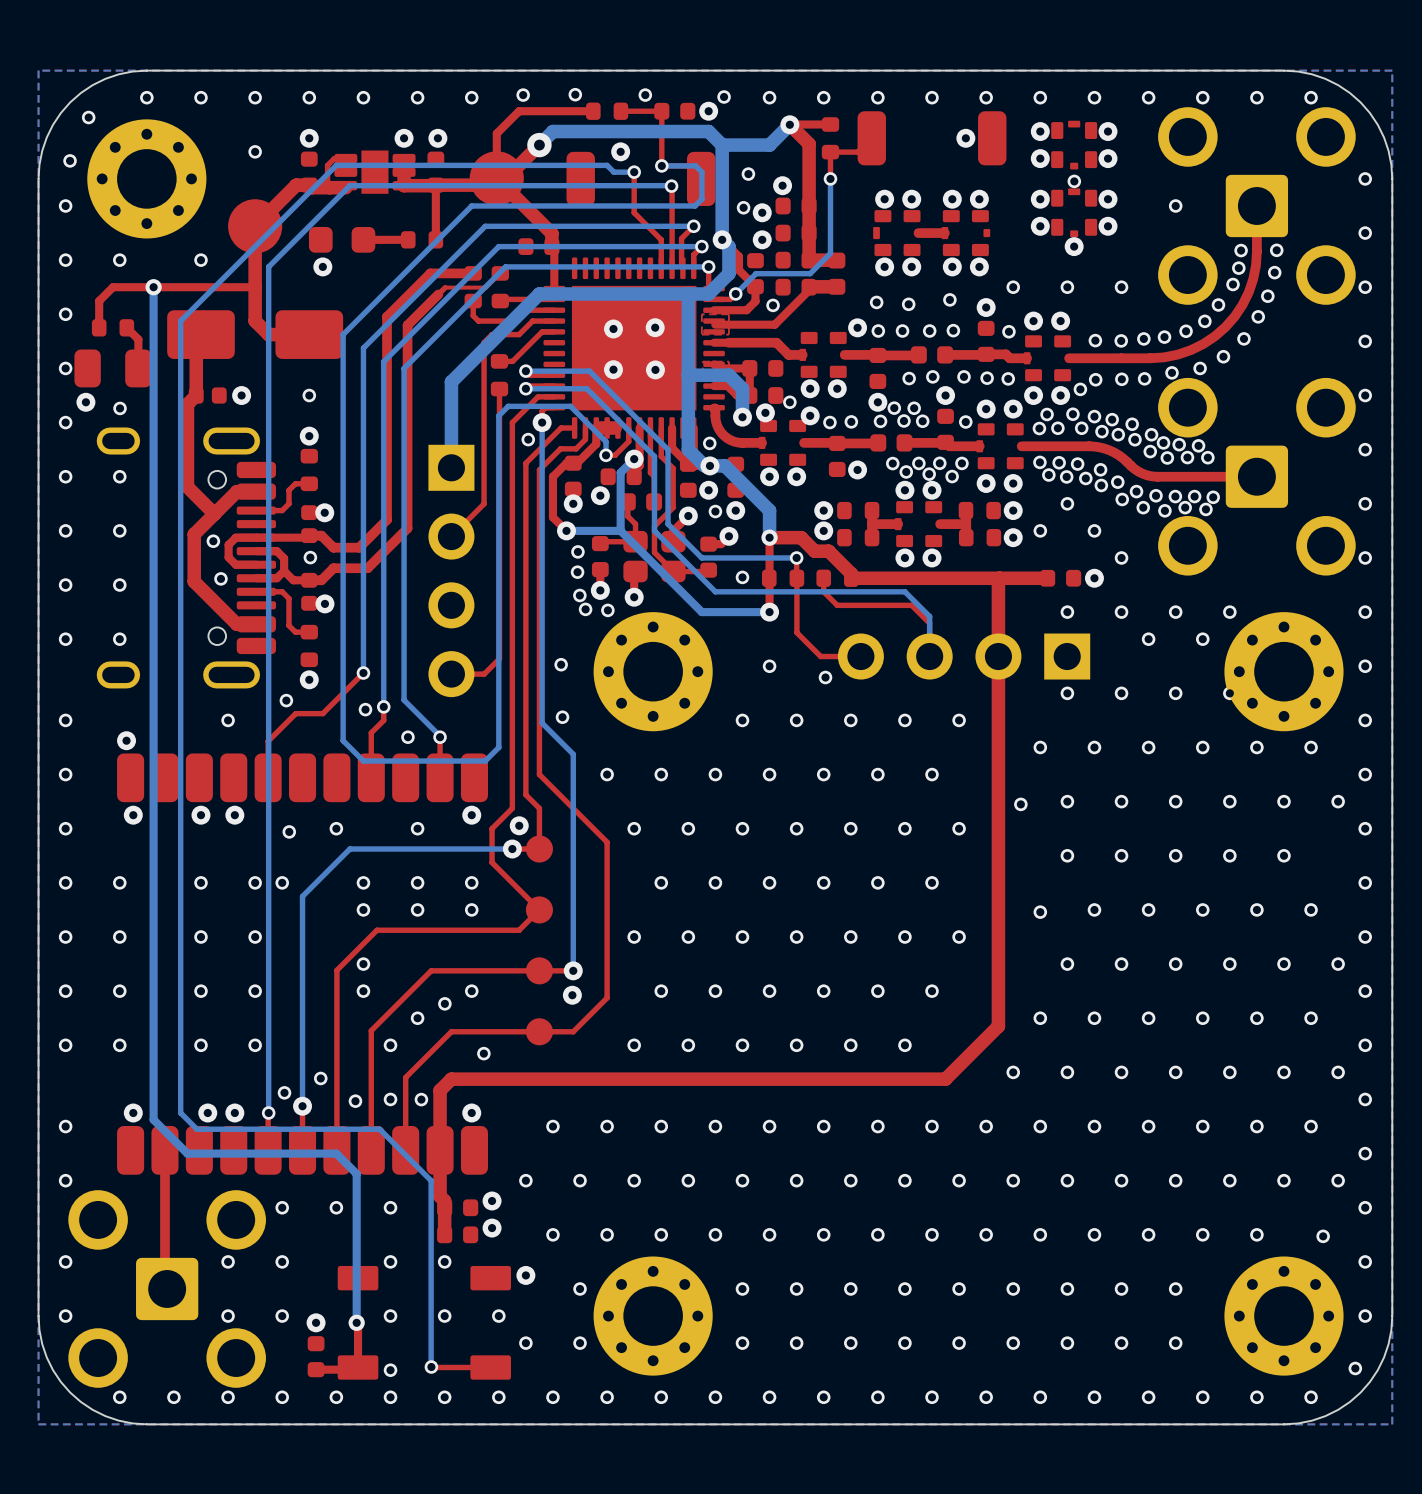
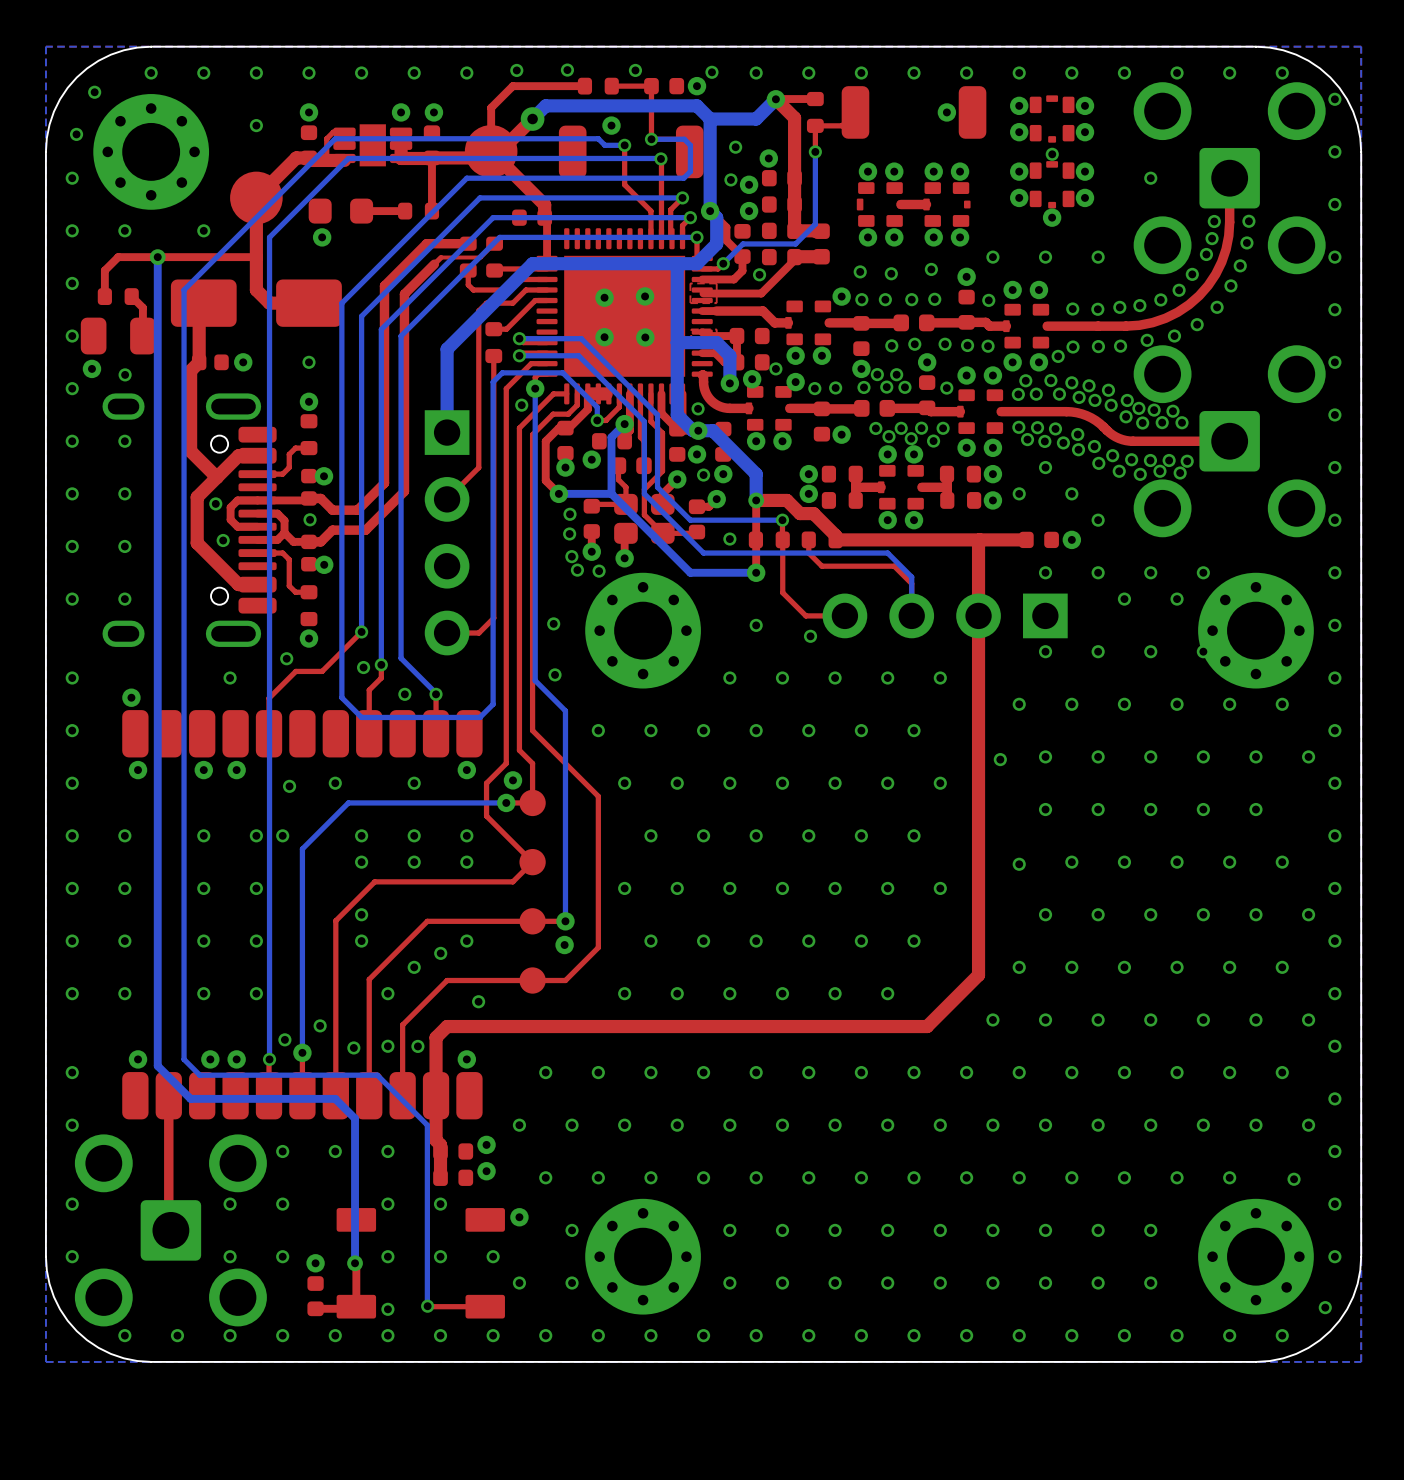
via: none -> (1334, 99)

